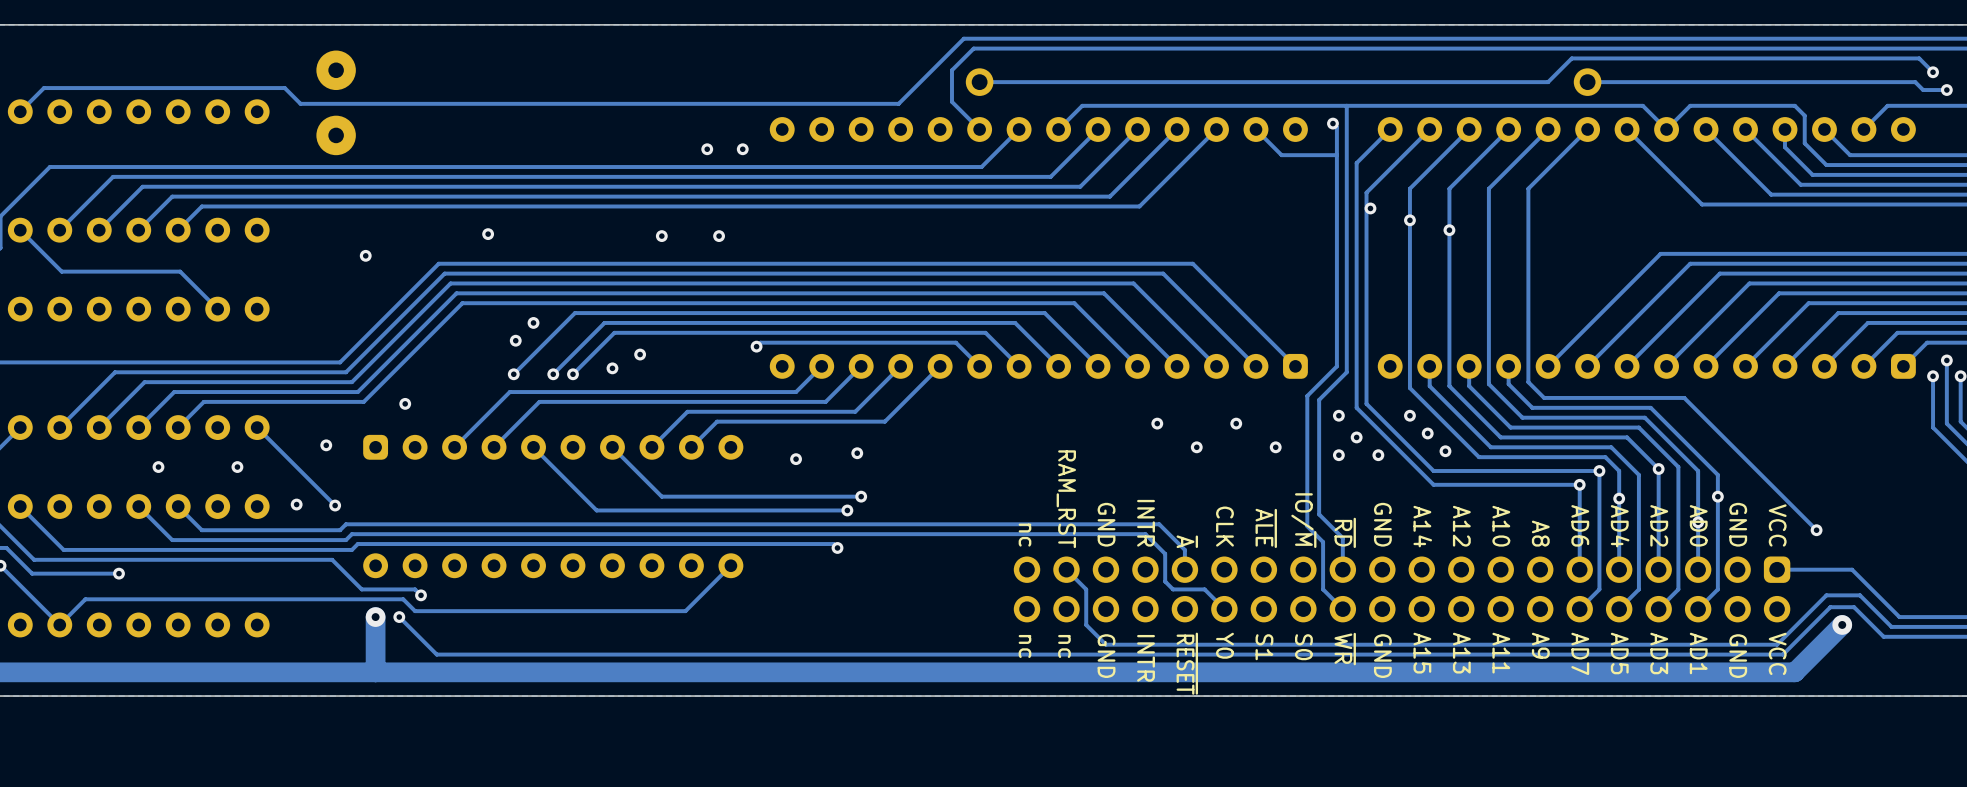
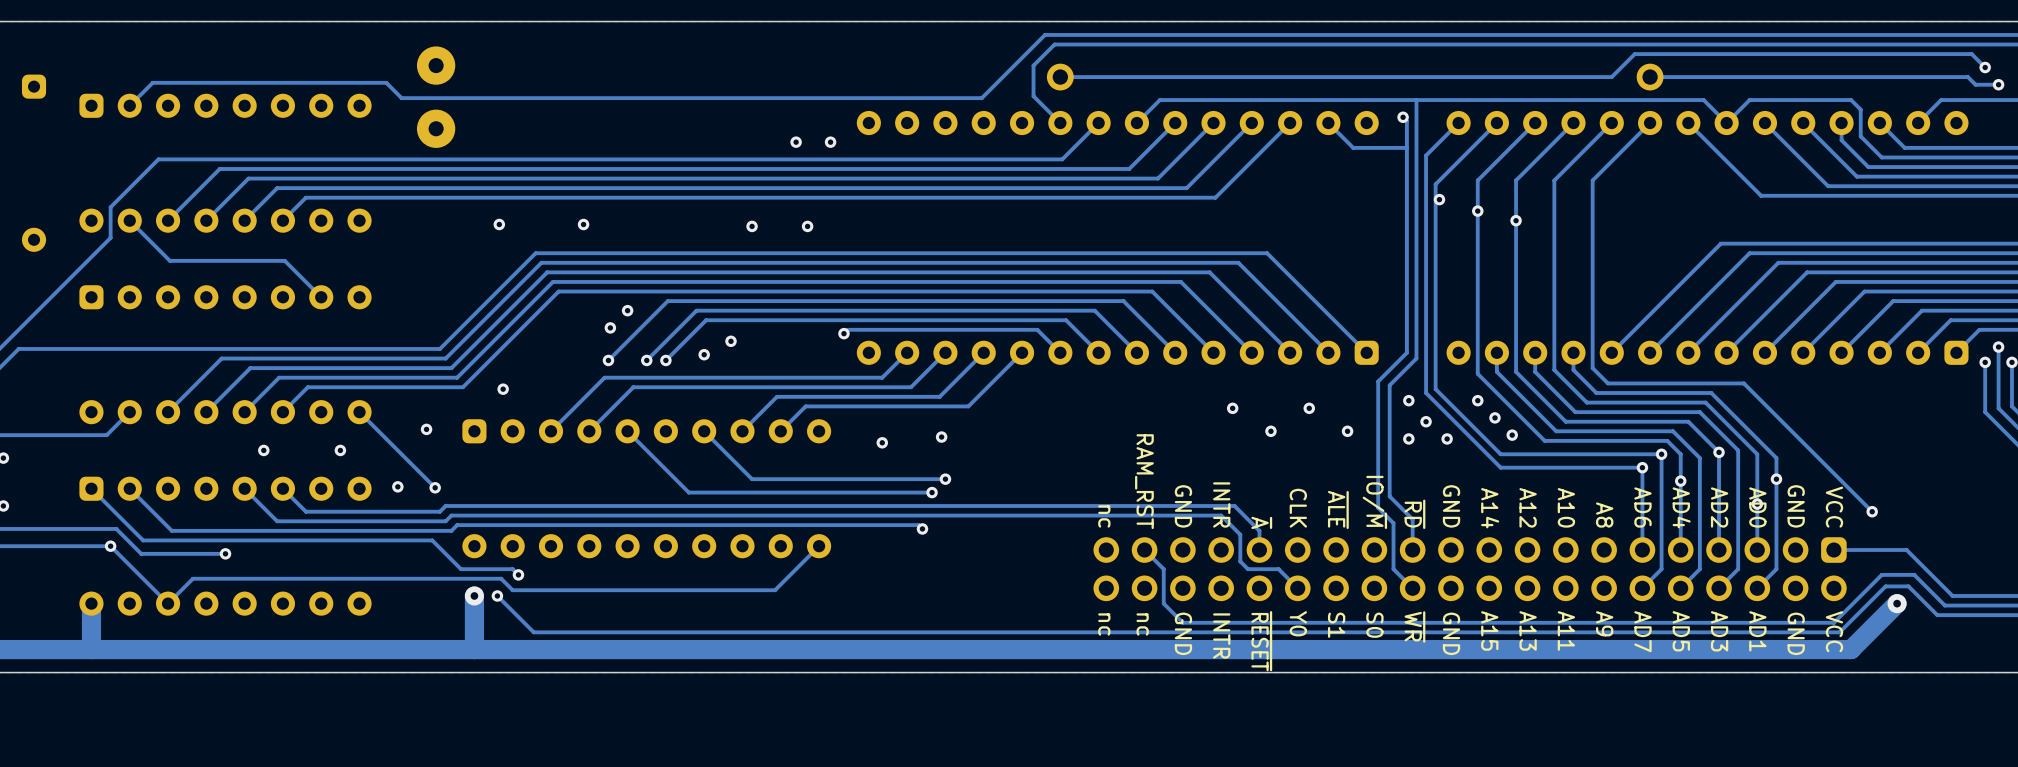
via position: (365, 255) -> (499, 224)

